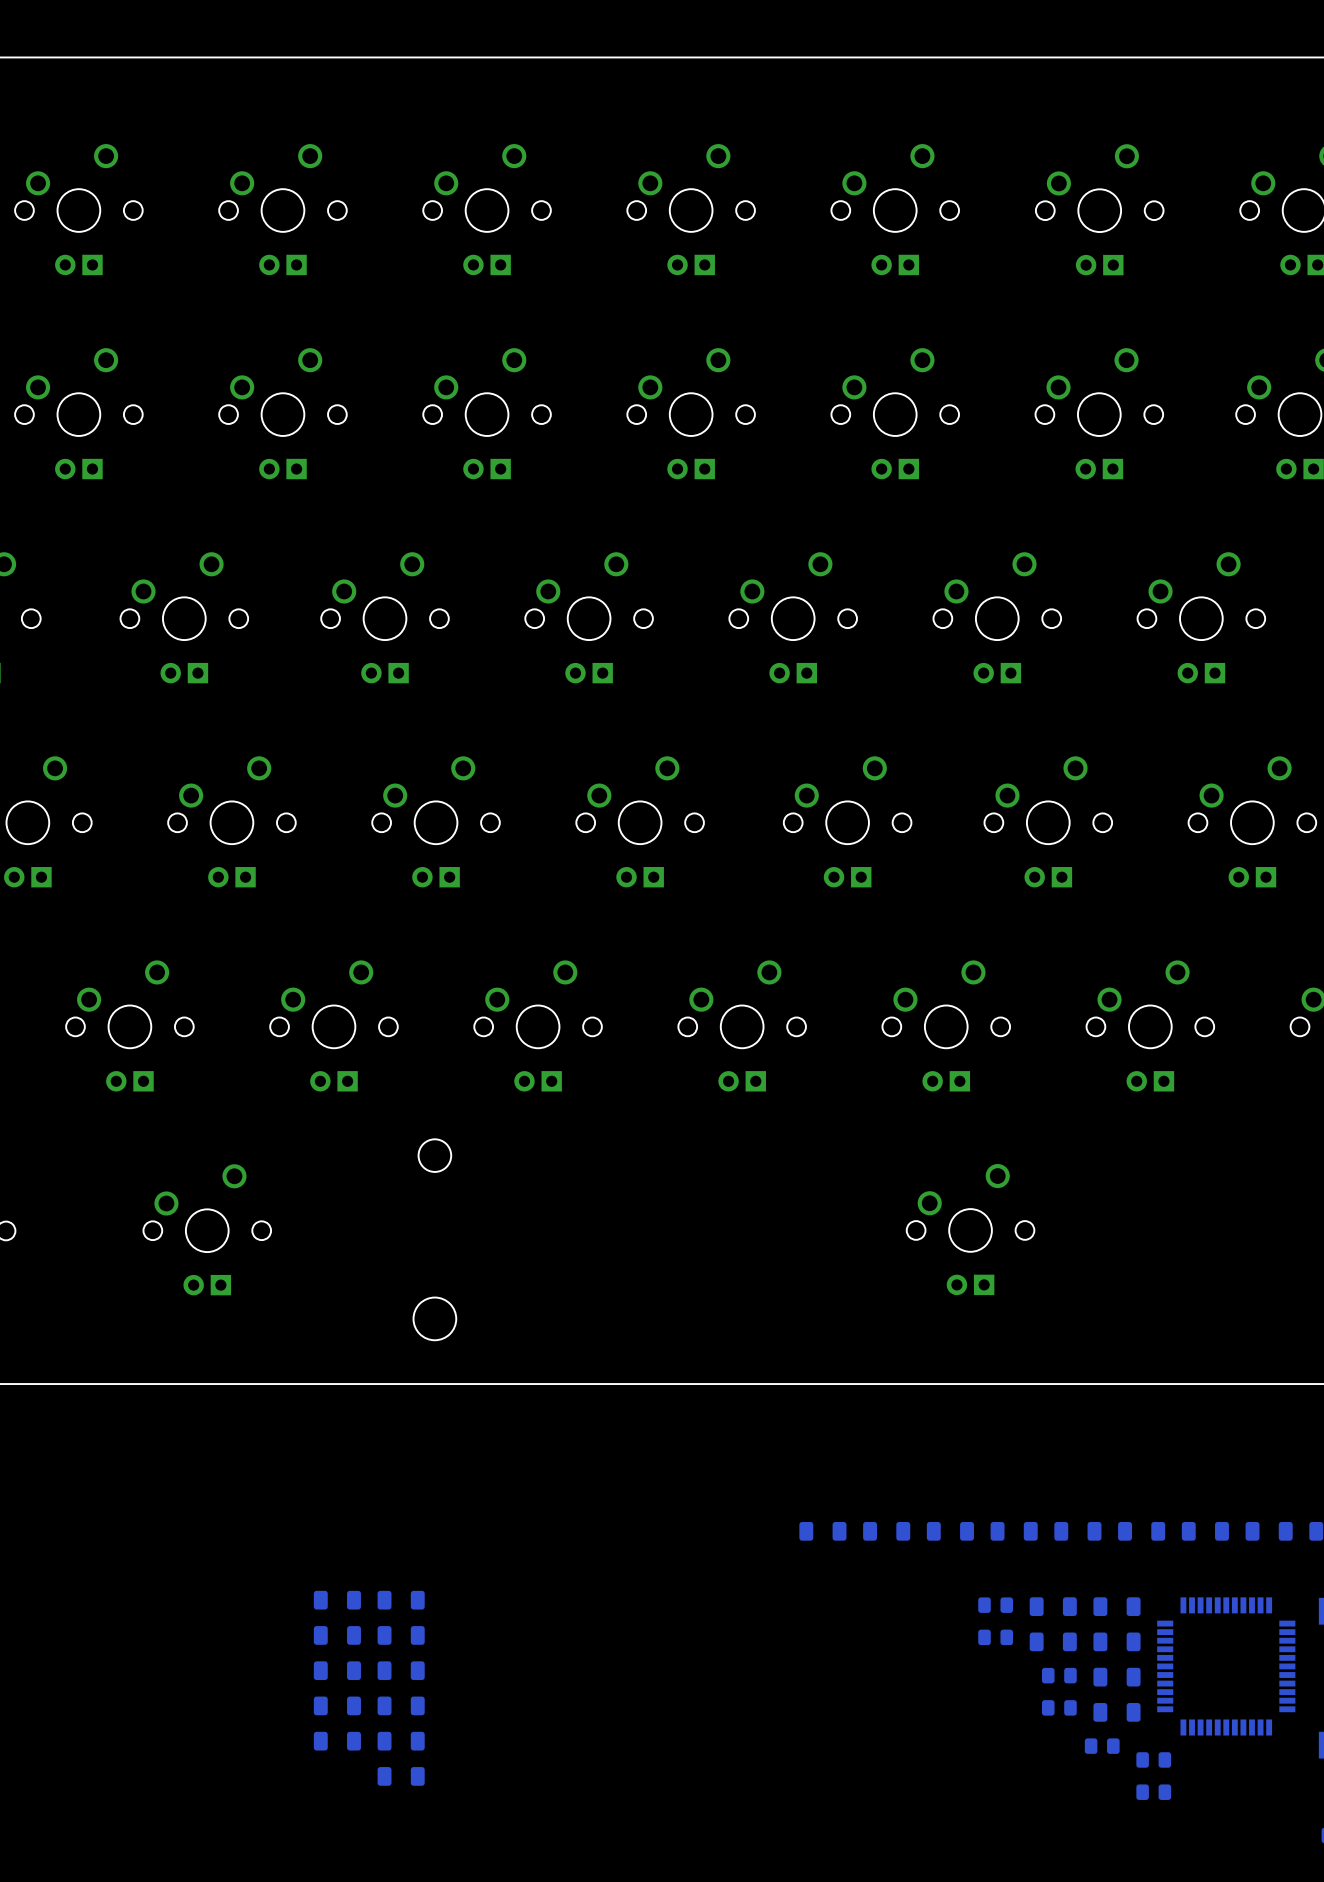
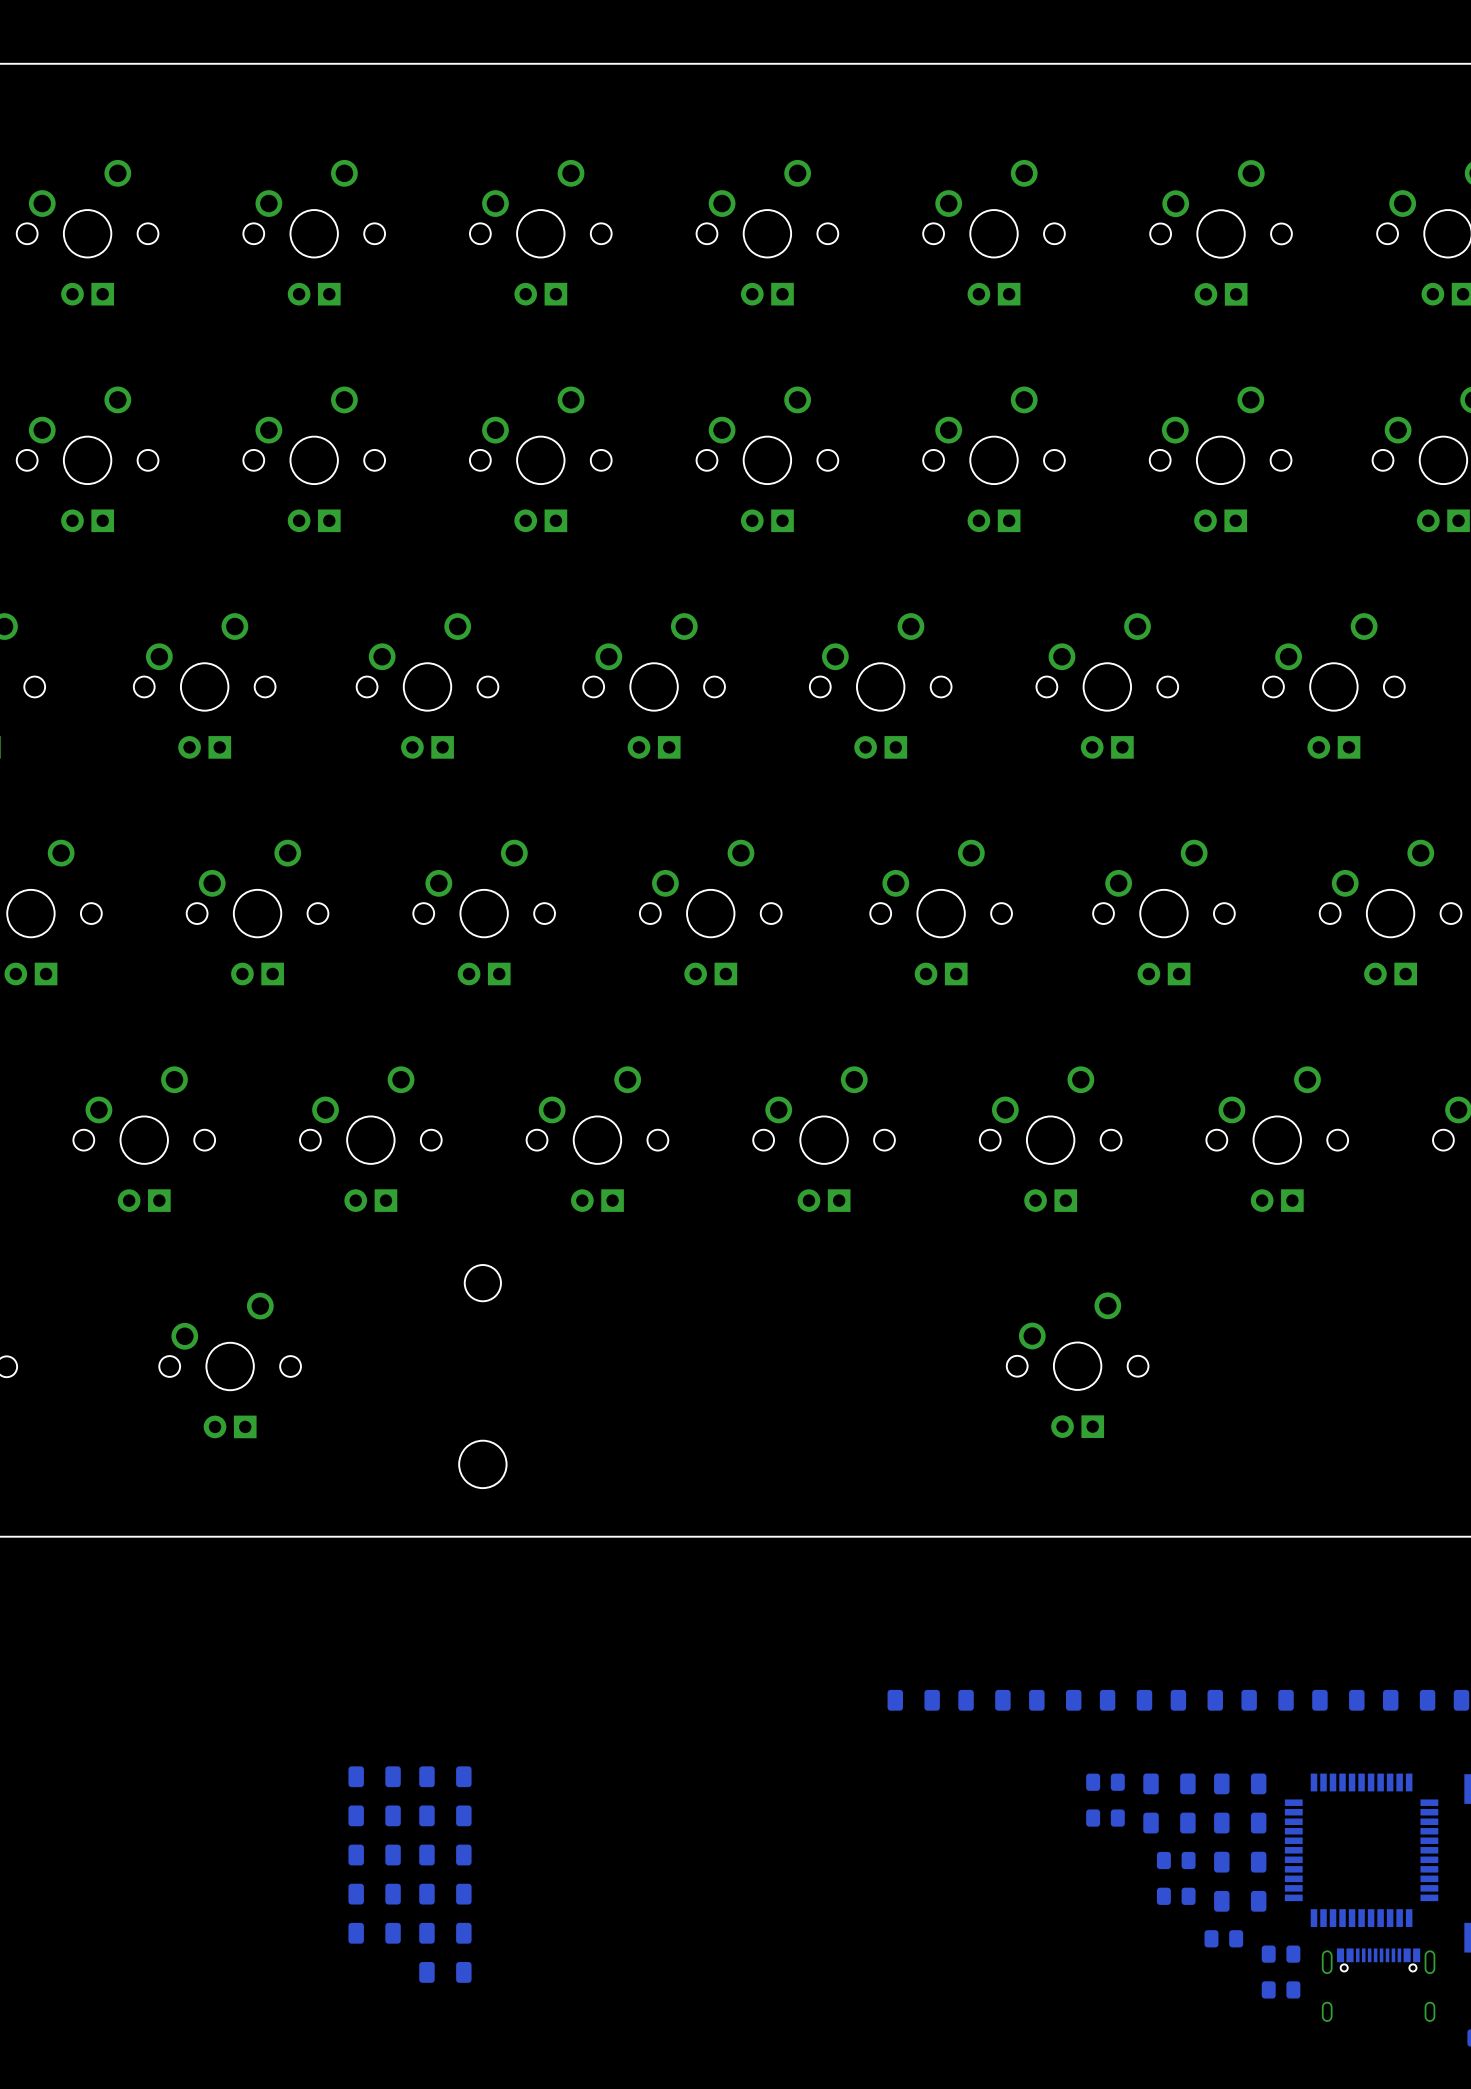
part: none -> (1378, 1985)

